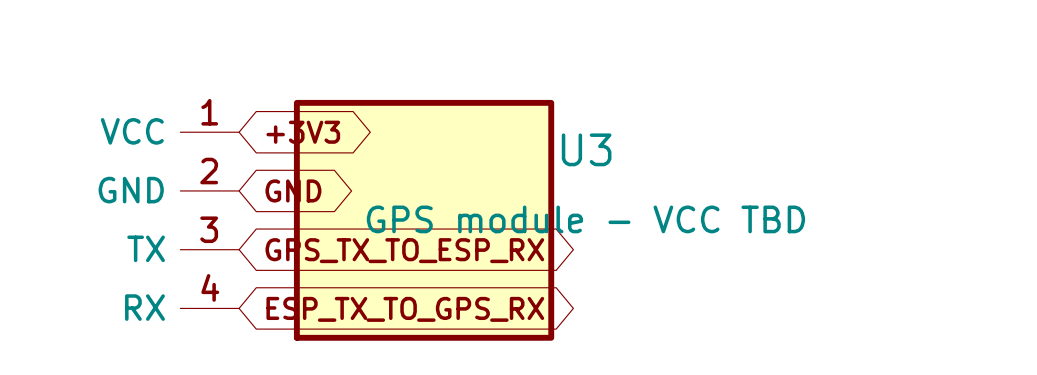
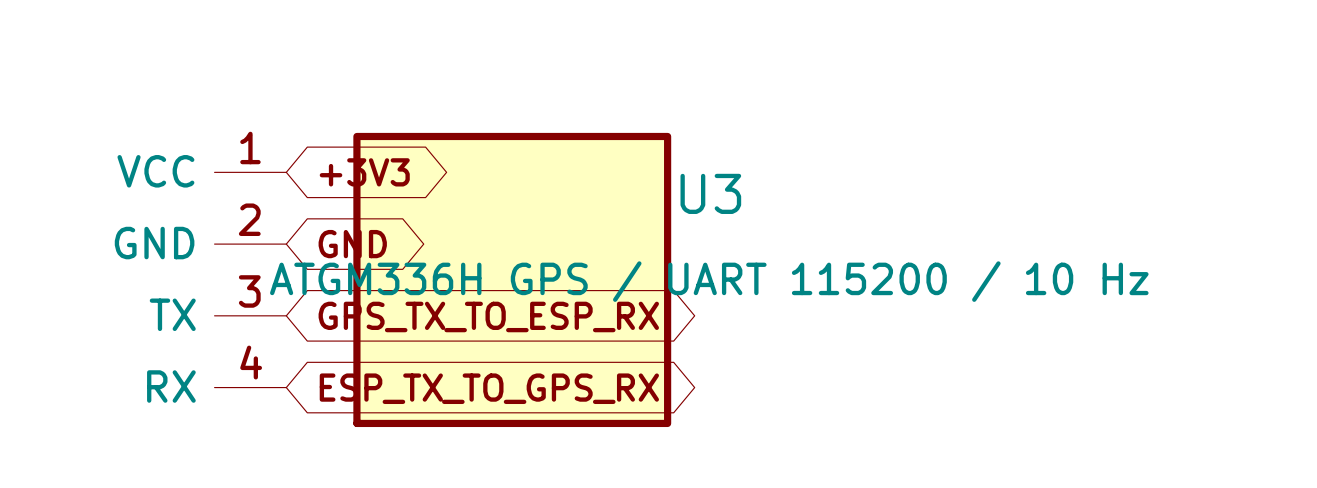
U3 value: GPS module - VCC TBD (585, 219) -> ATGM336H GPS / UART 115200 / 10 Hz (709, 281)

